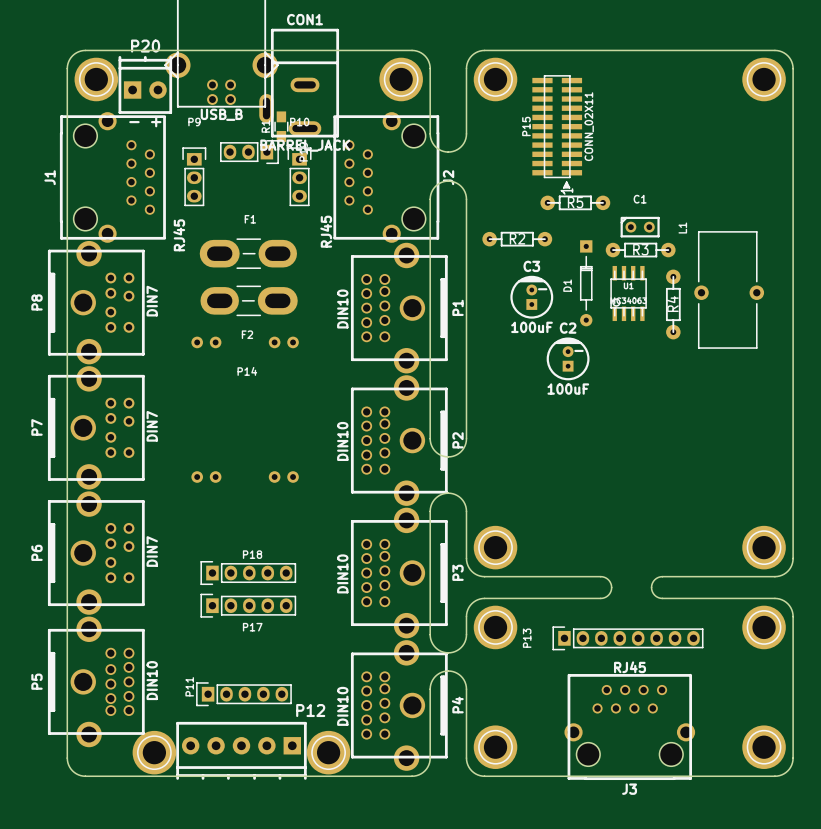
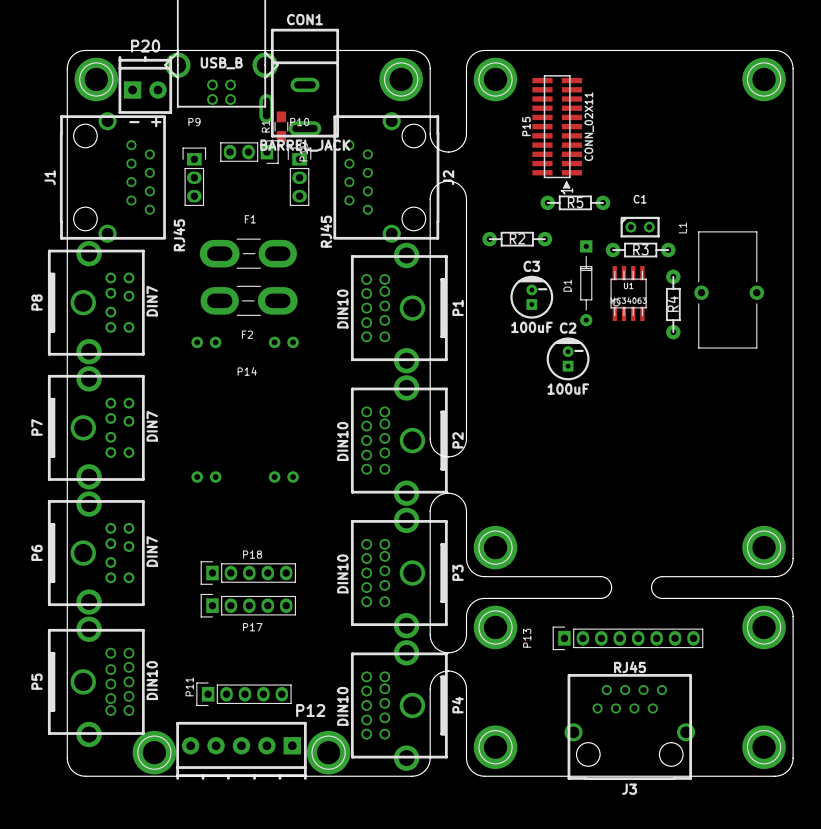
part value position: USB_B (221, 114) -> USB_B (221, 63)

